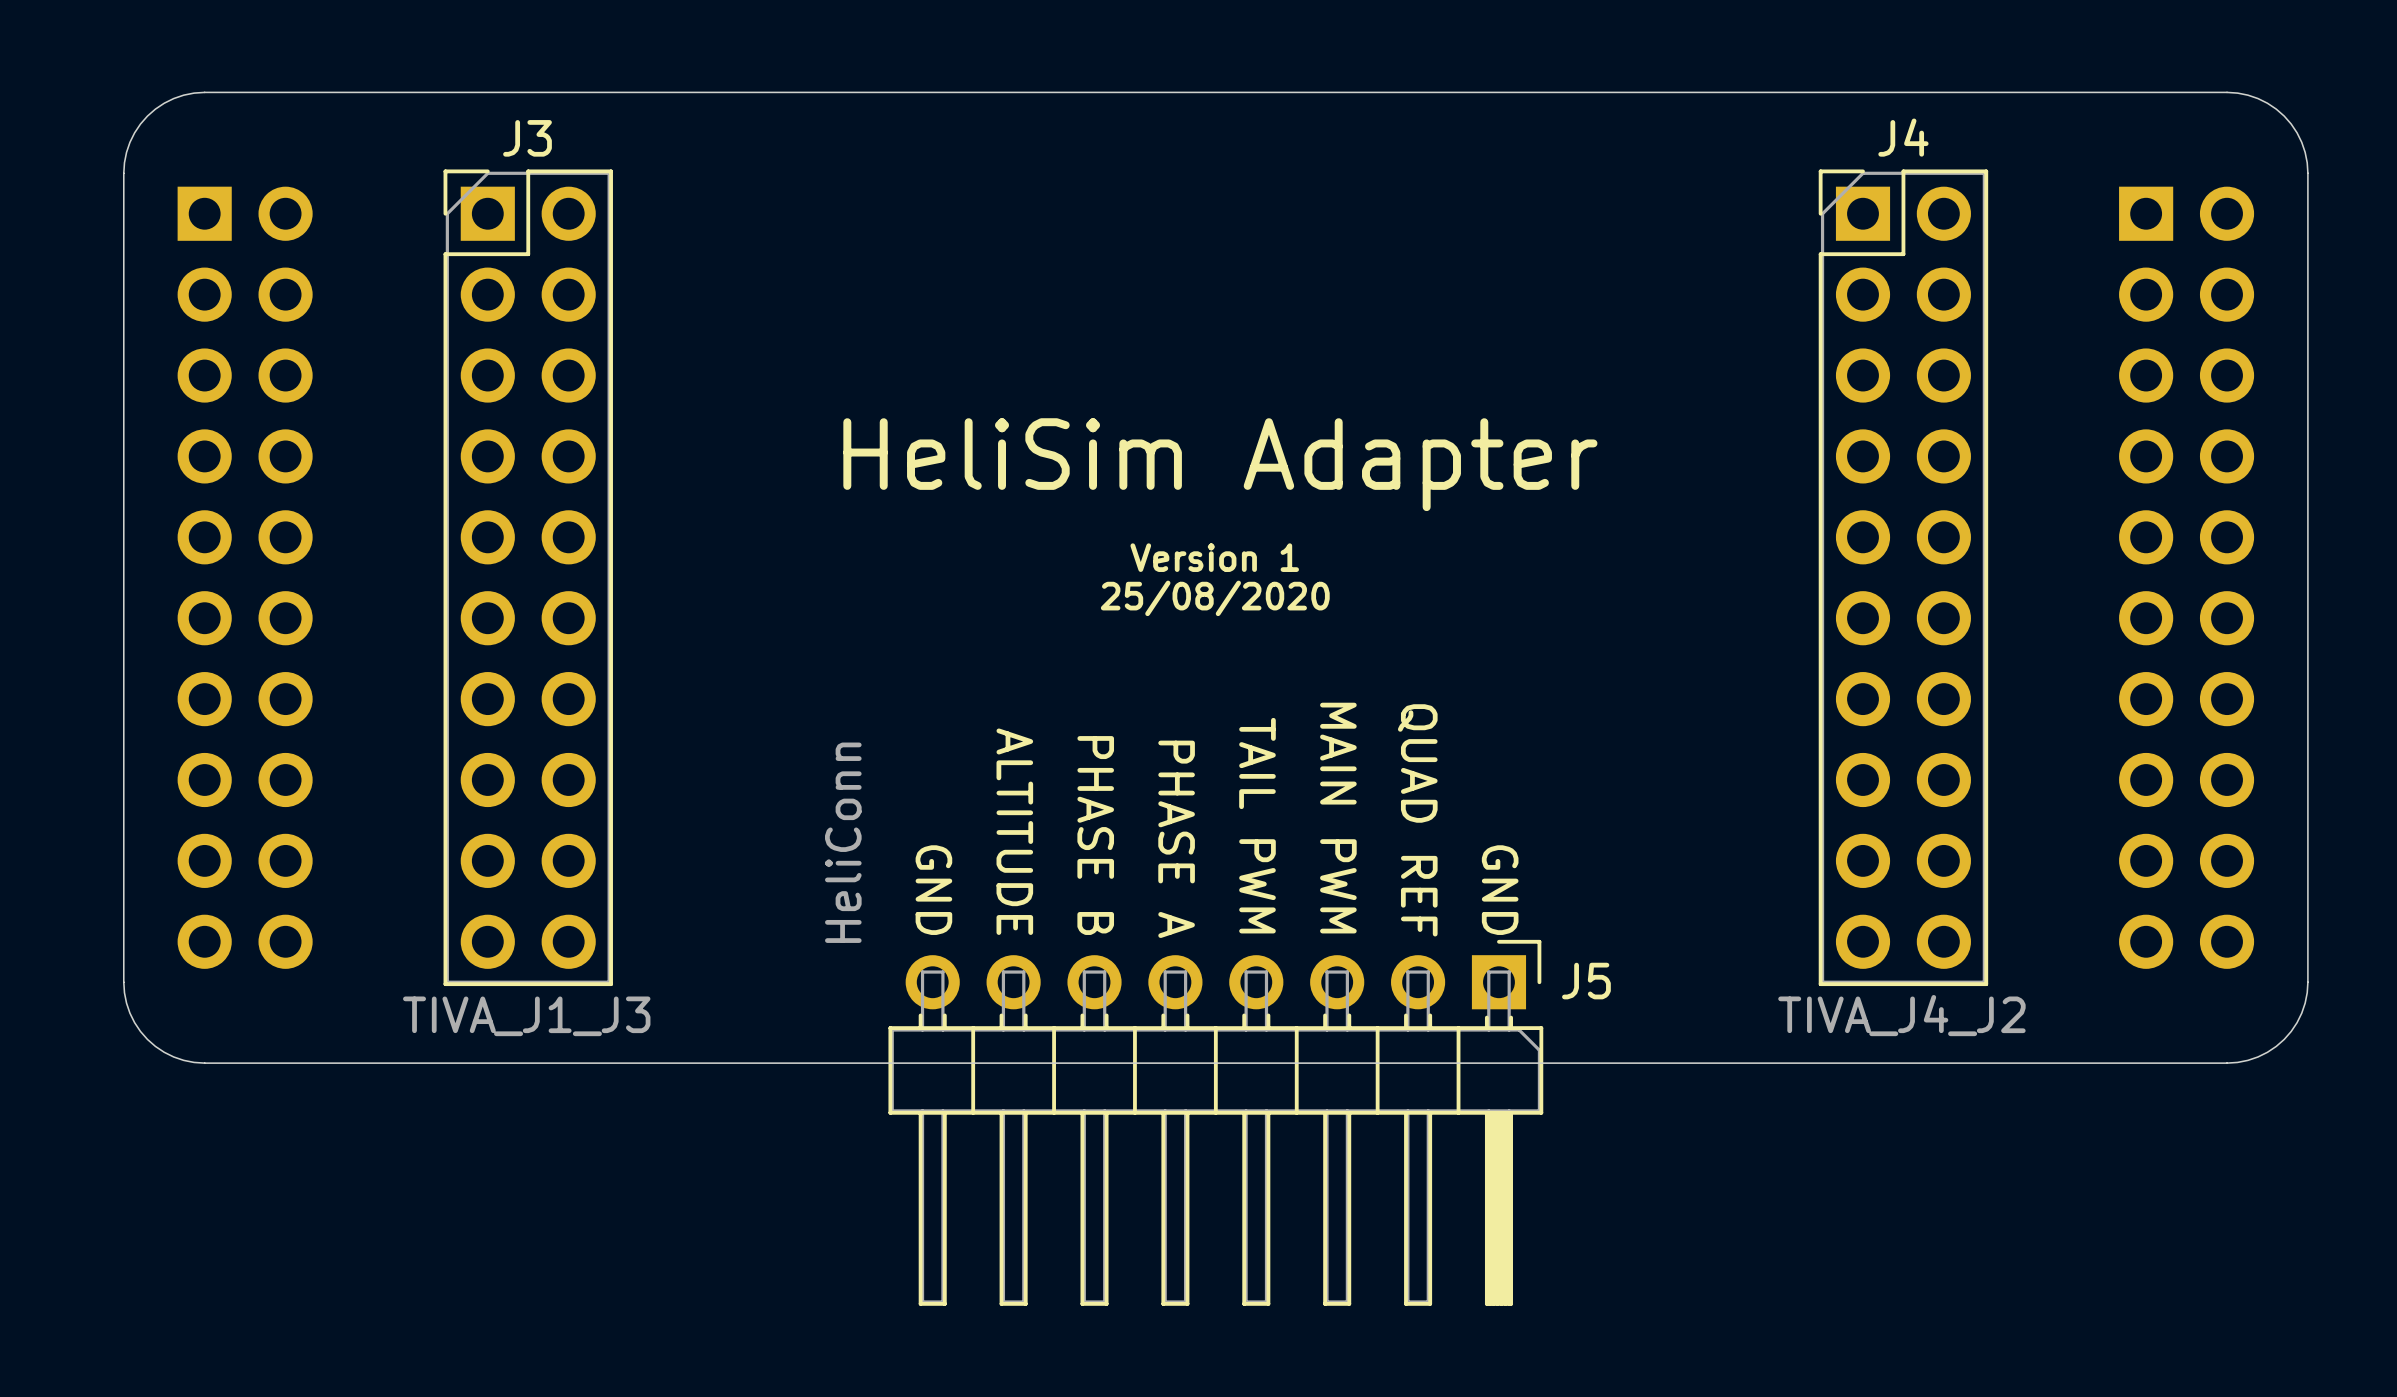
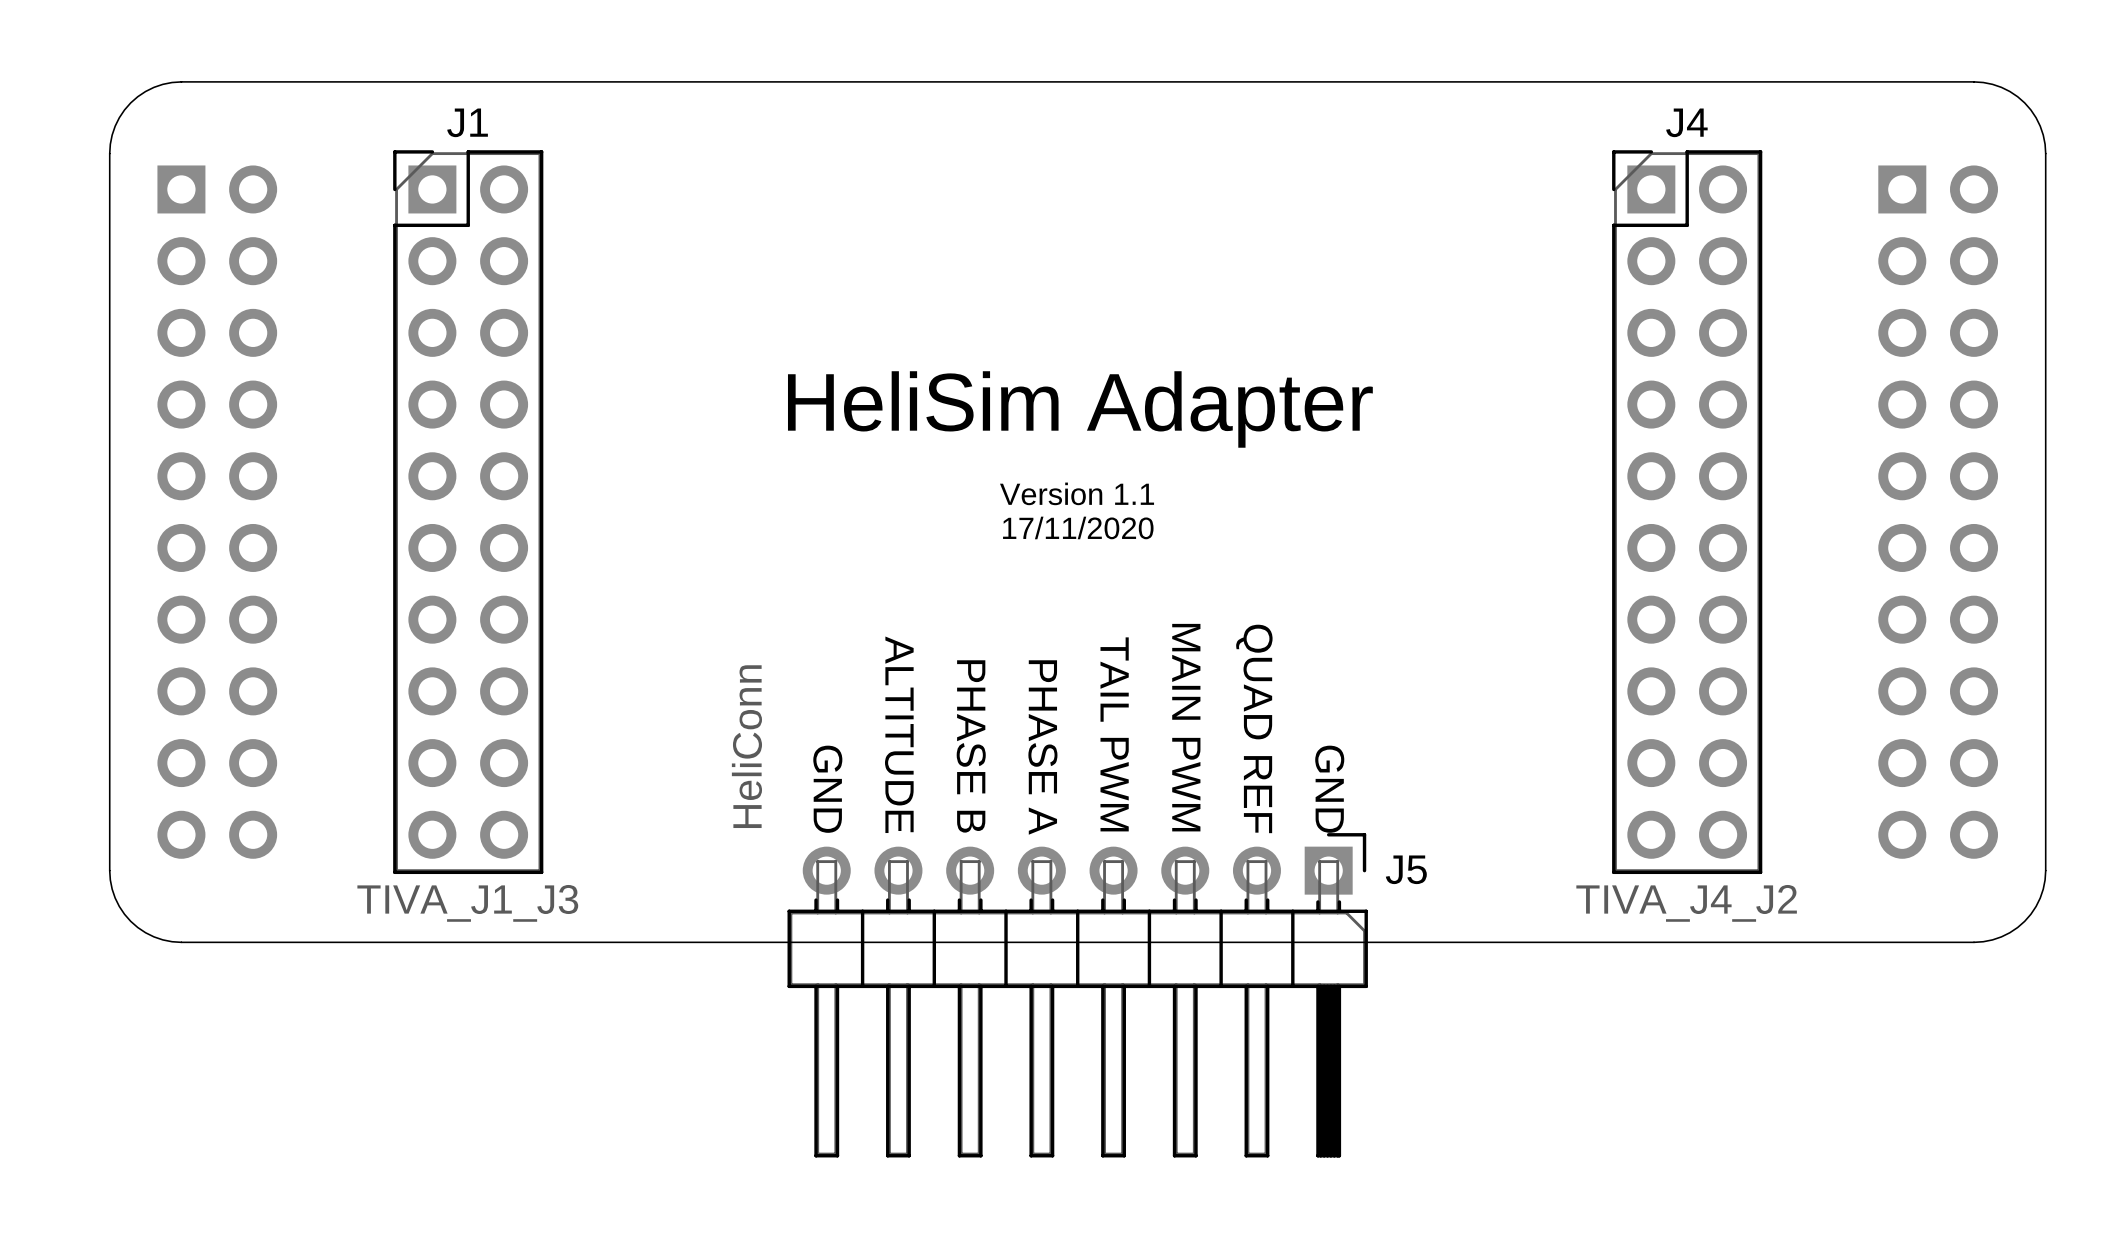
J3 name: J3 (527, 138) -> J1 (467, 122)
text: Version 1 (1214, 557) -> Version 1.1 (1077, 493)
text: 25/08/2020 (1215, 598) -> 17/11/2020 (1078, 527)

